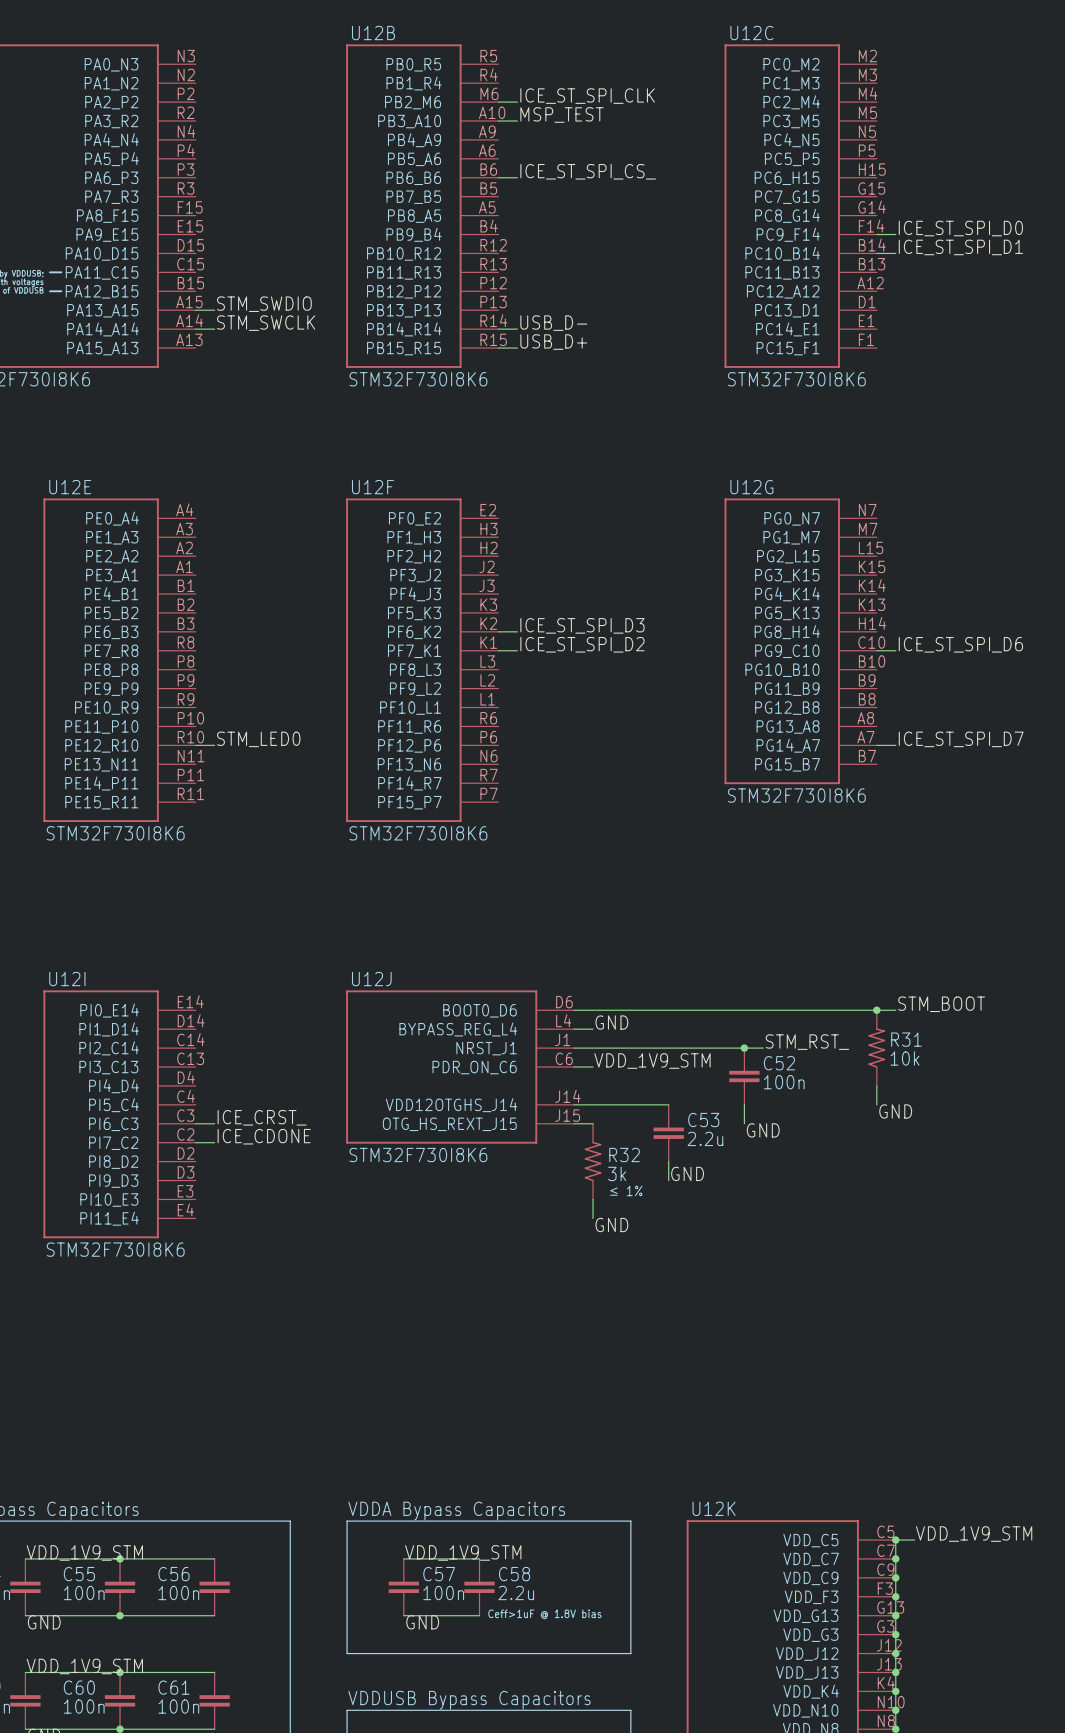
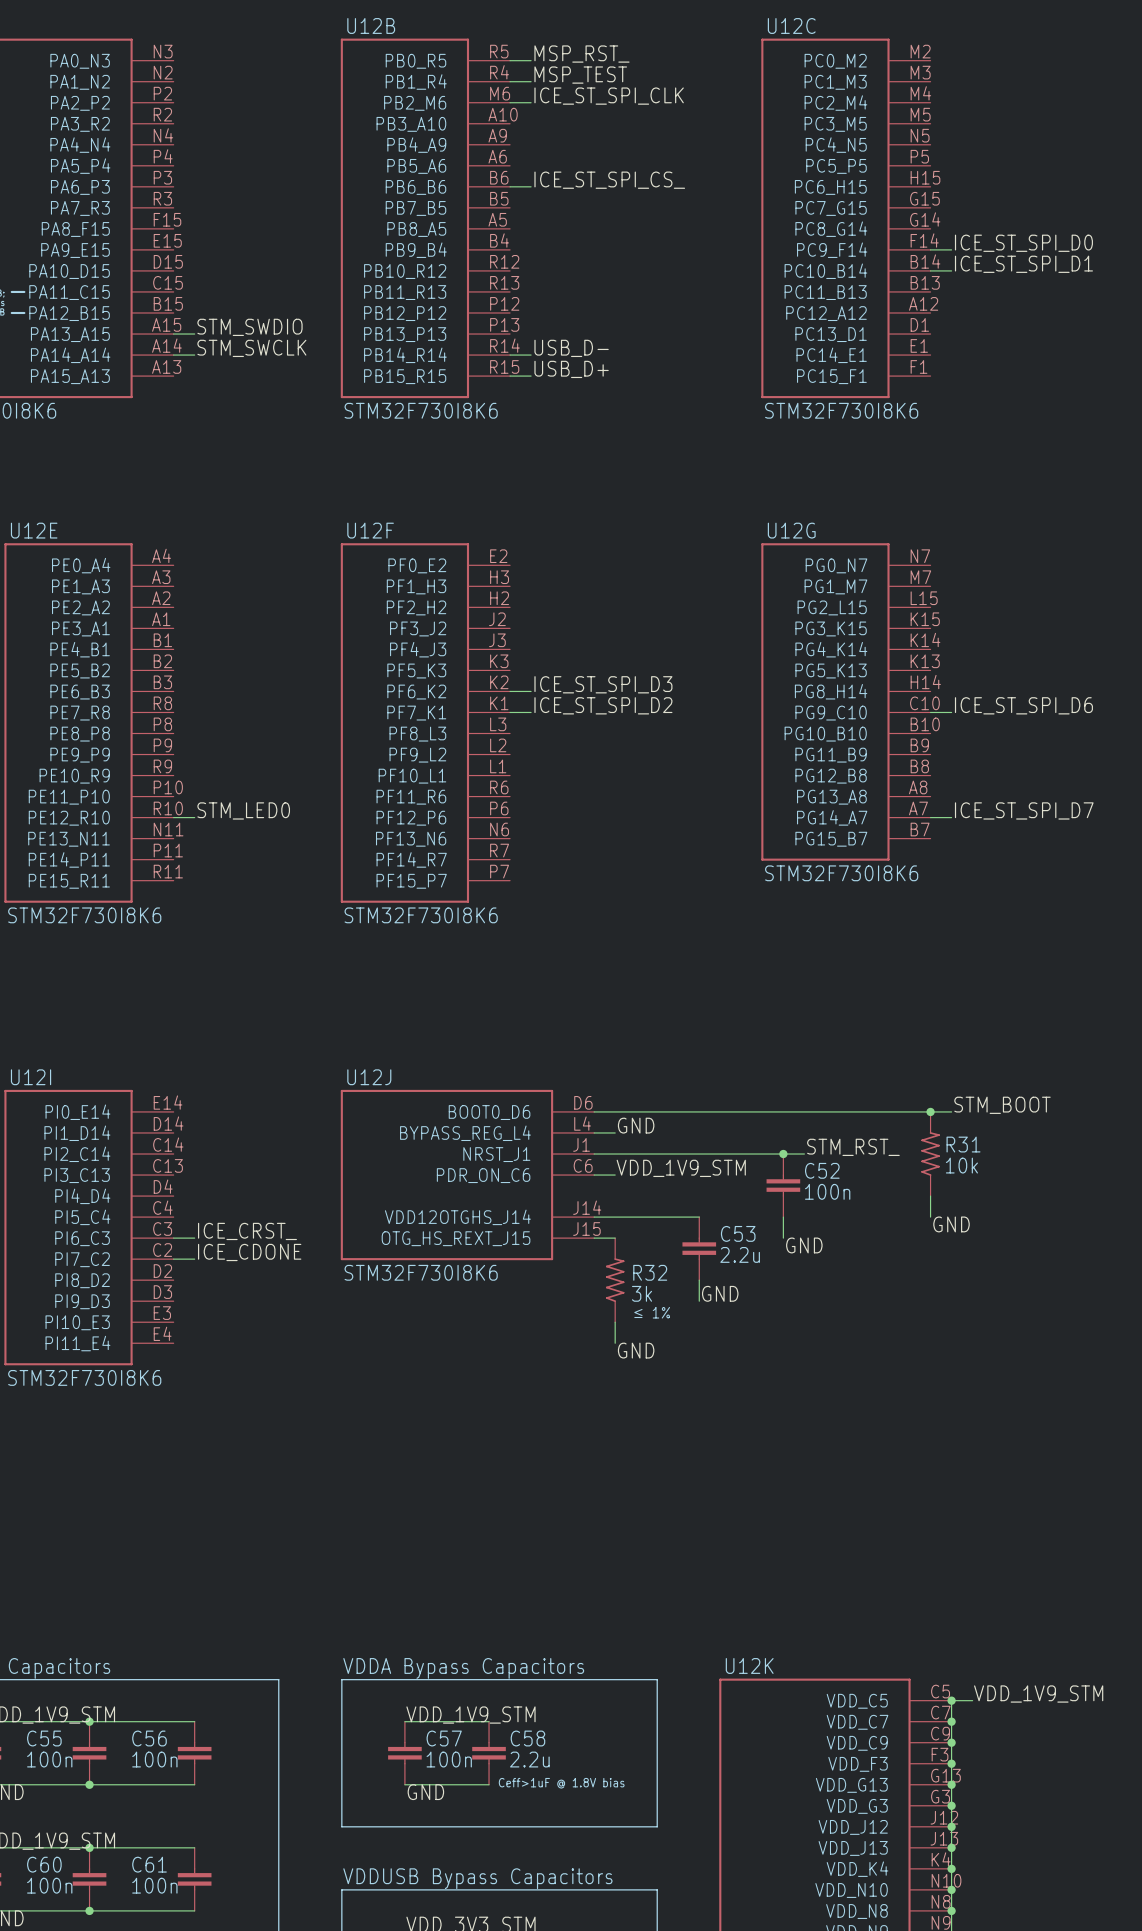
label: none -> MSP_RST_ (581, 54)
wire: none -> (510, 60) (531, 60)
label position: MSP_TEST (562, 115) -> MSP_TEST (580, 75)
wire: (498, 121) (517, 121) -> (510, 81) (531, 81)

